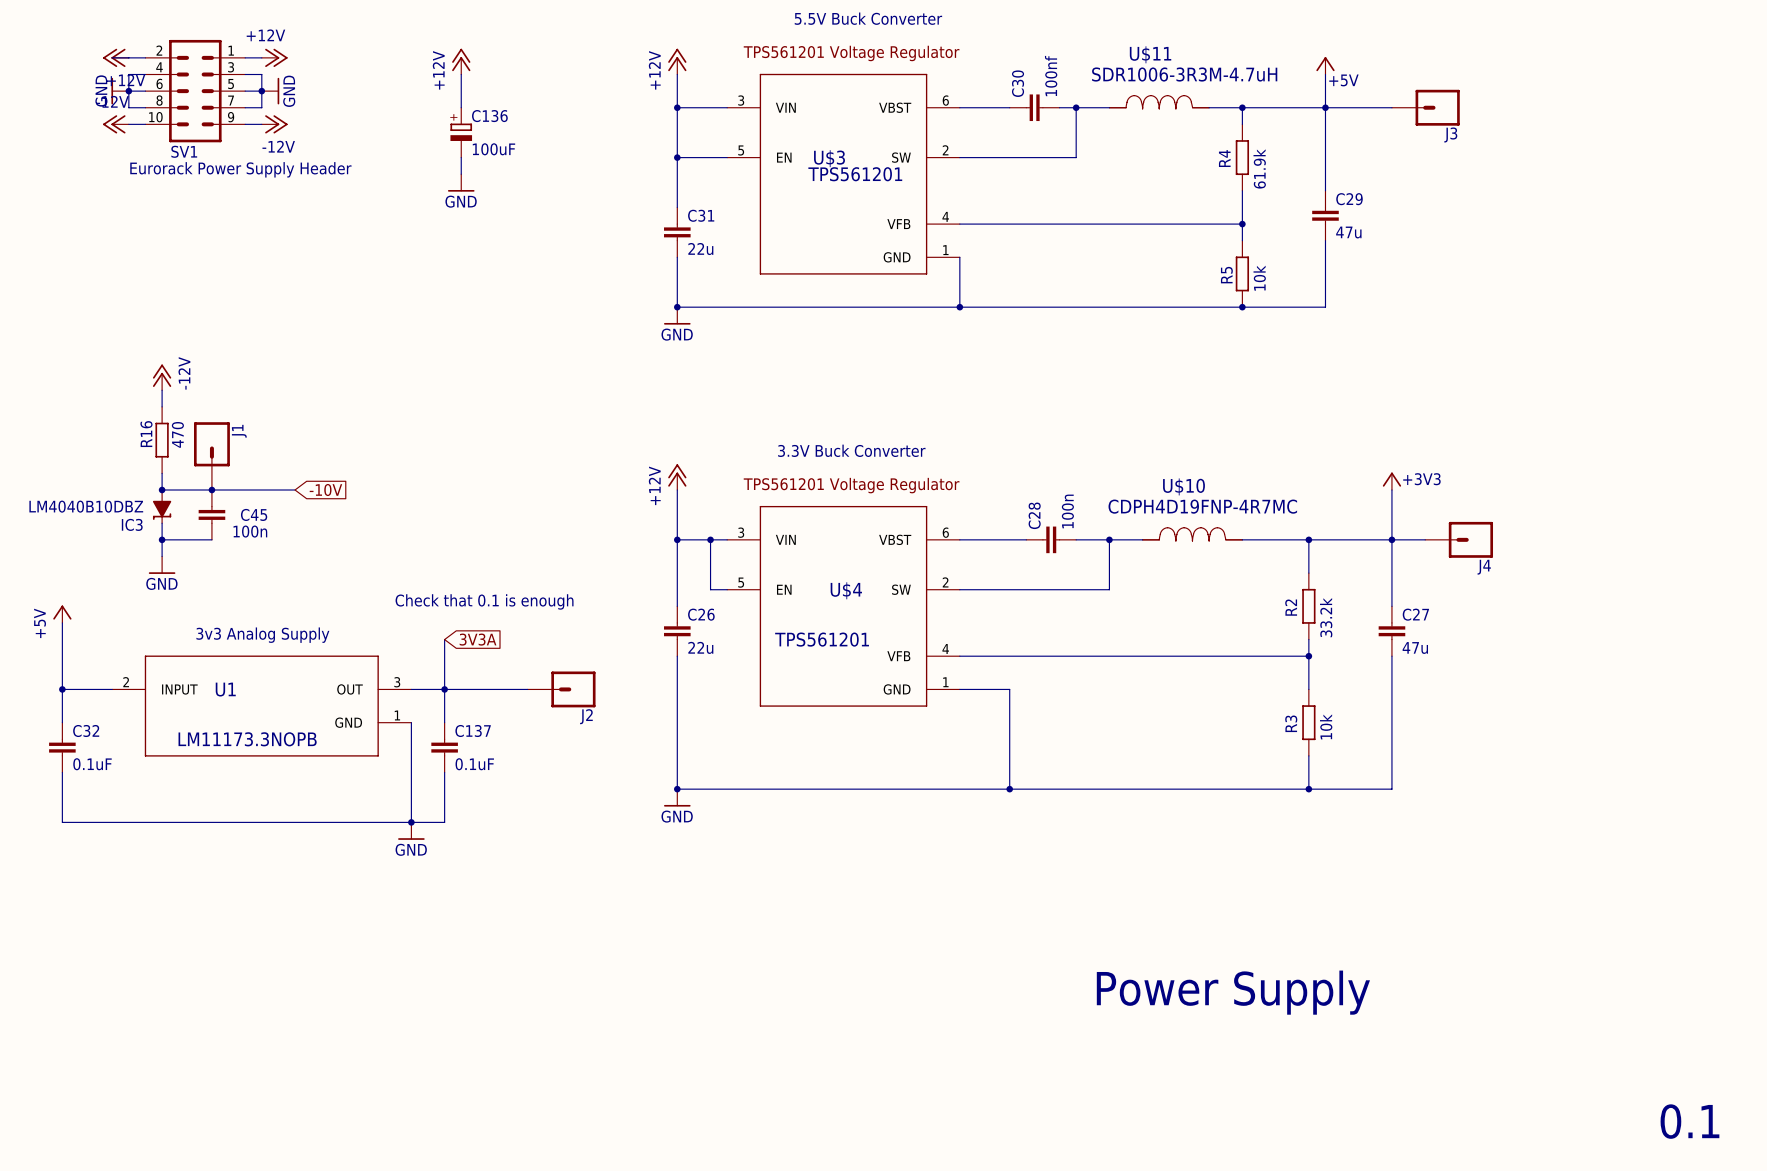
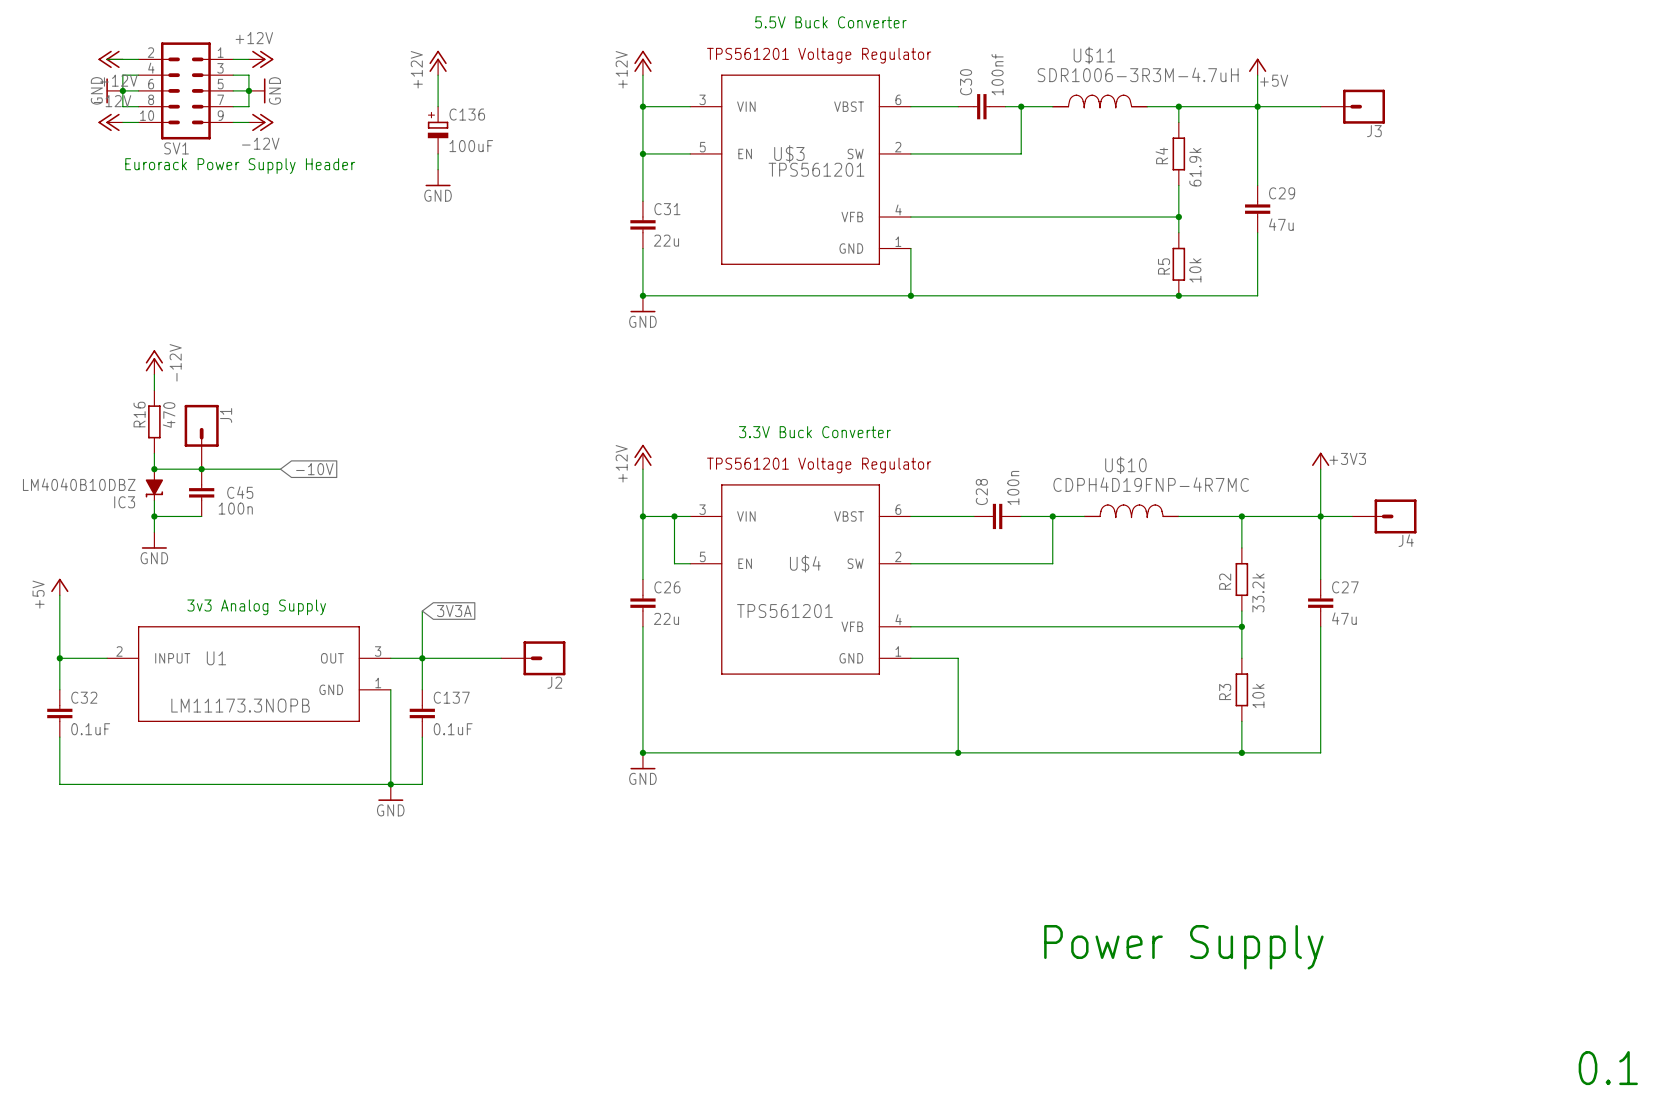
text: Check that 0.1 is enough (484, 601) -> none

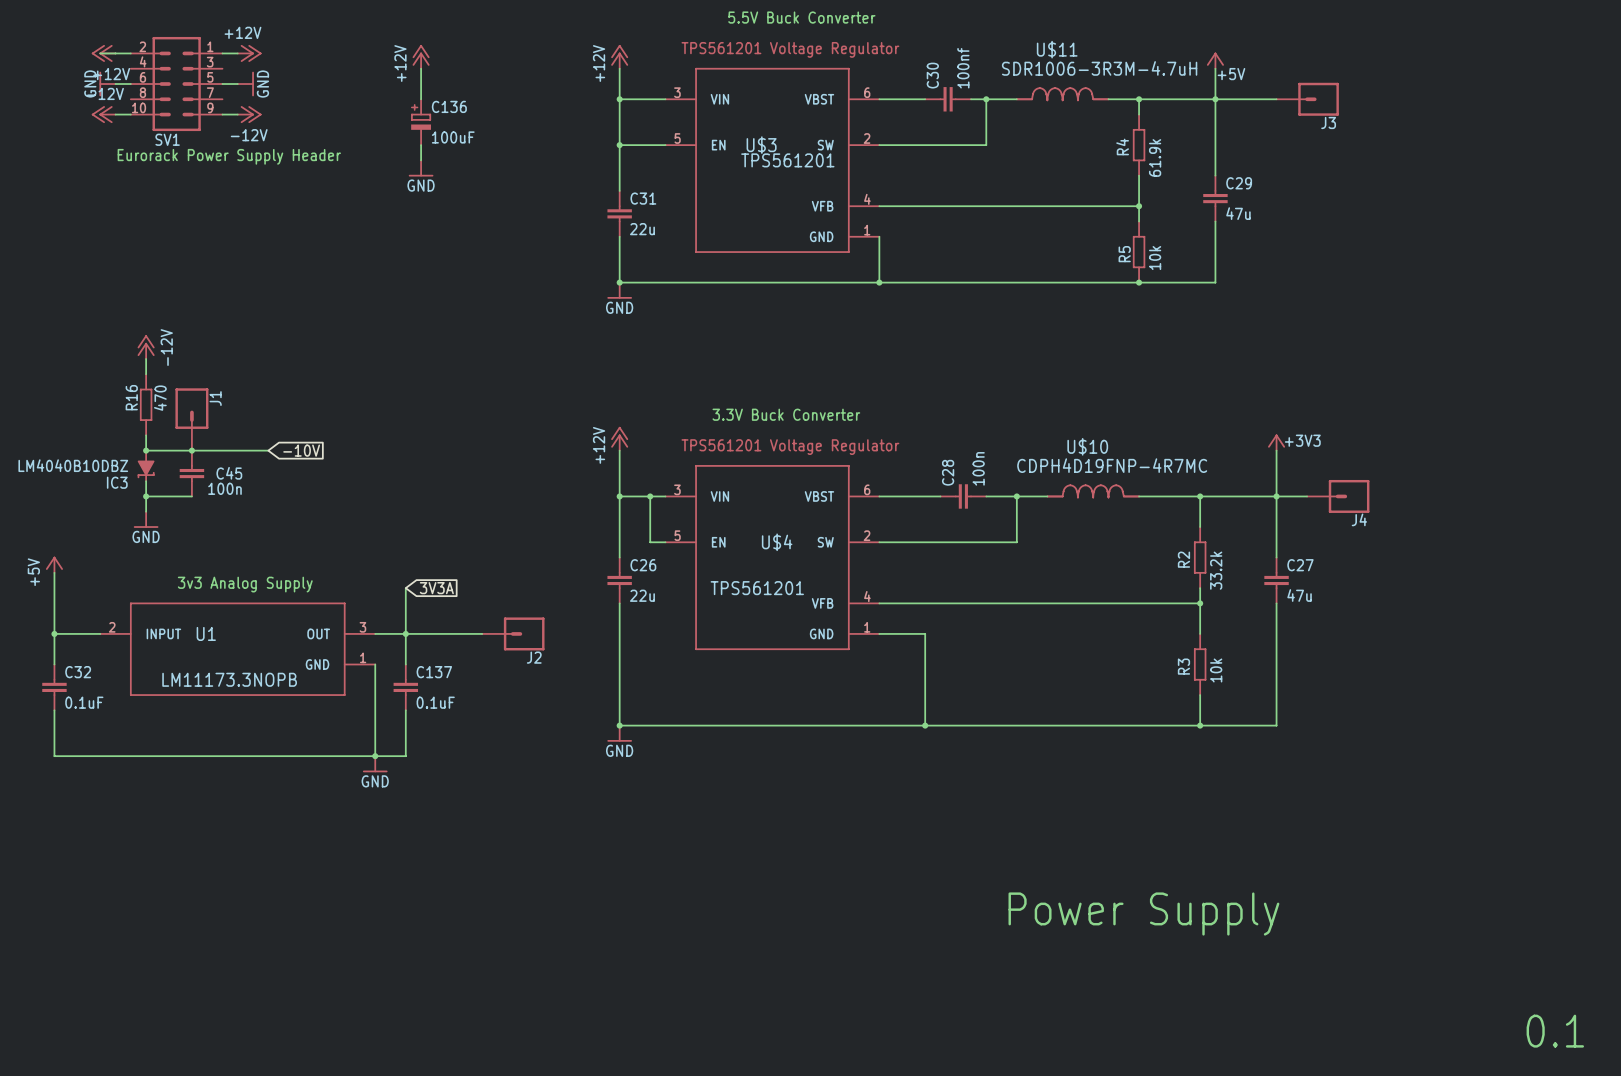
wire: (138, 75) (122, 75) (122, 106) (138, 106) -> none
wire: (233, 75) (248, 75) (248, 106) (233, 106) -> none
junction: (122, 90) -> none
junction: (248, 90) -> none

